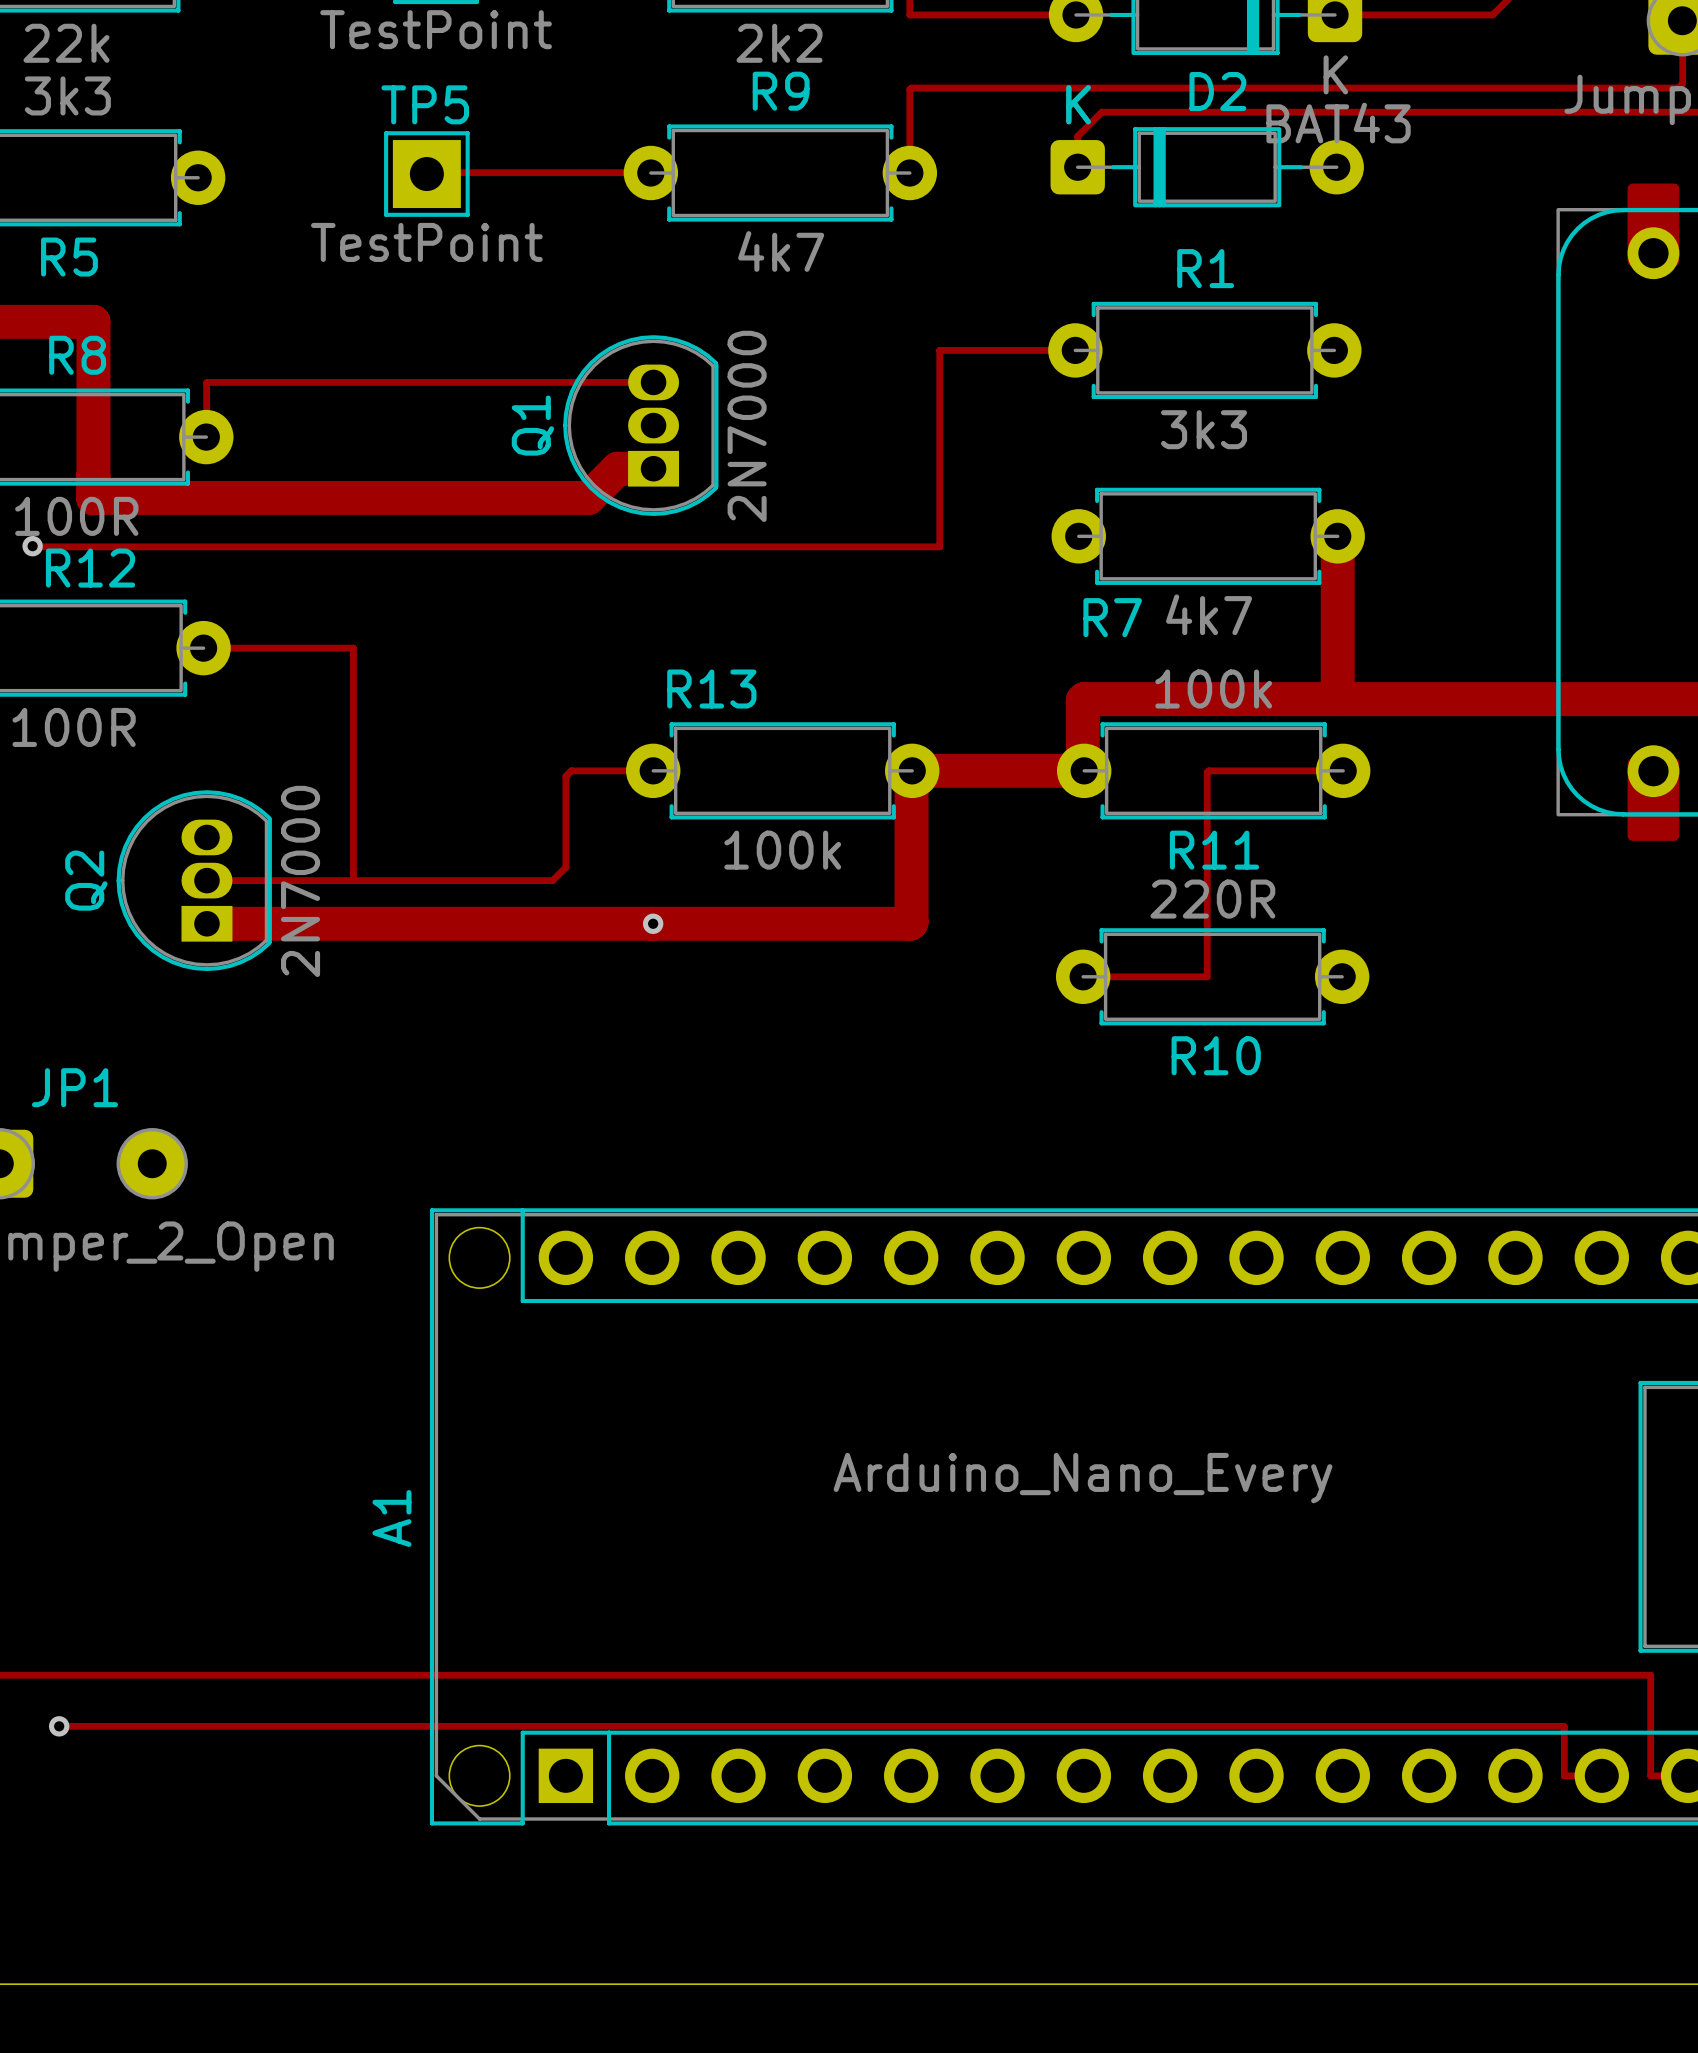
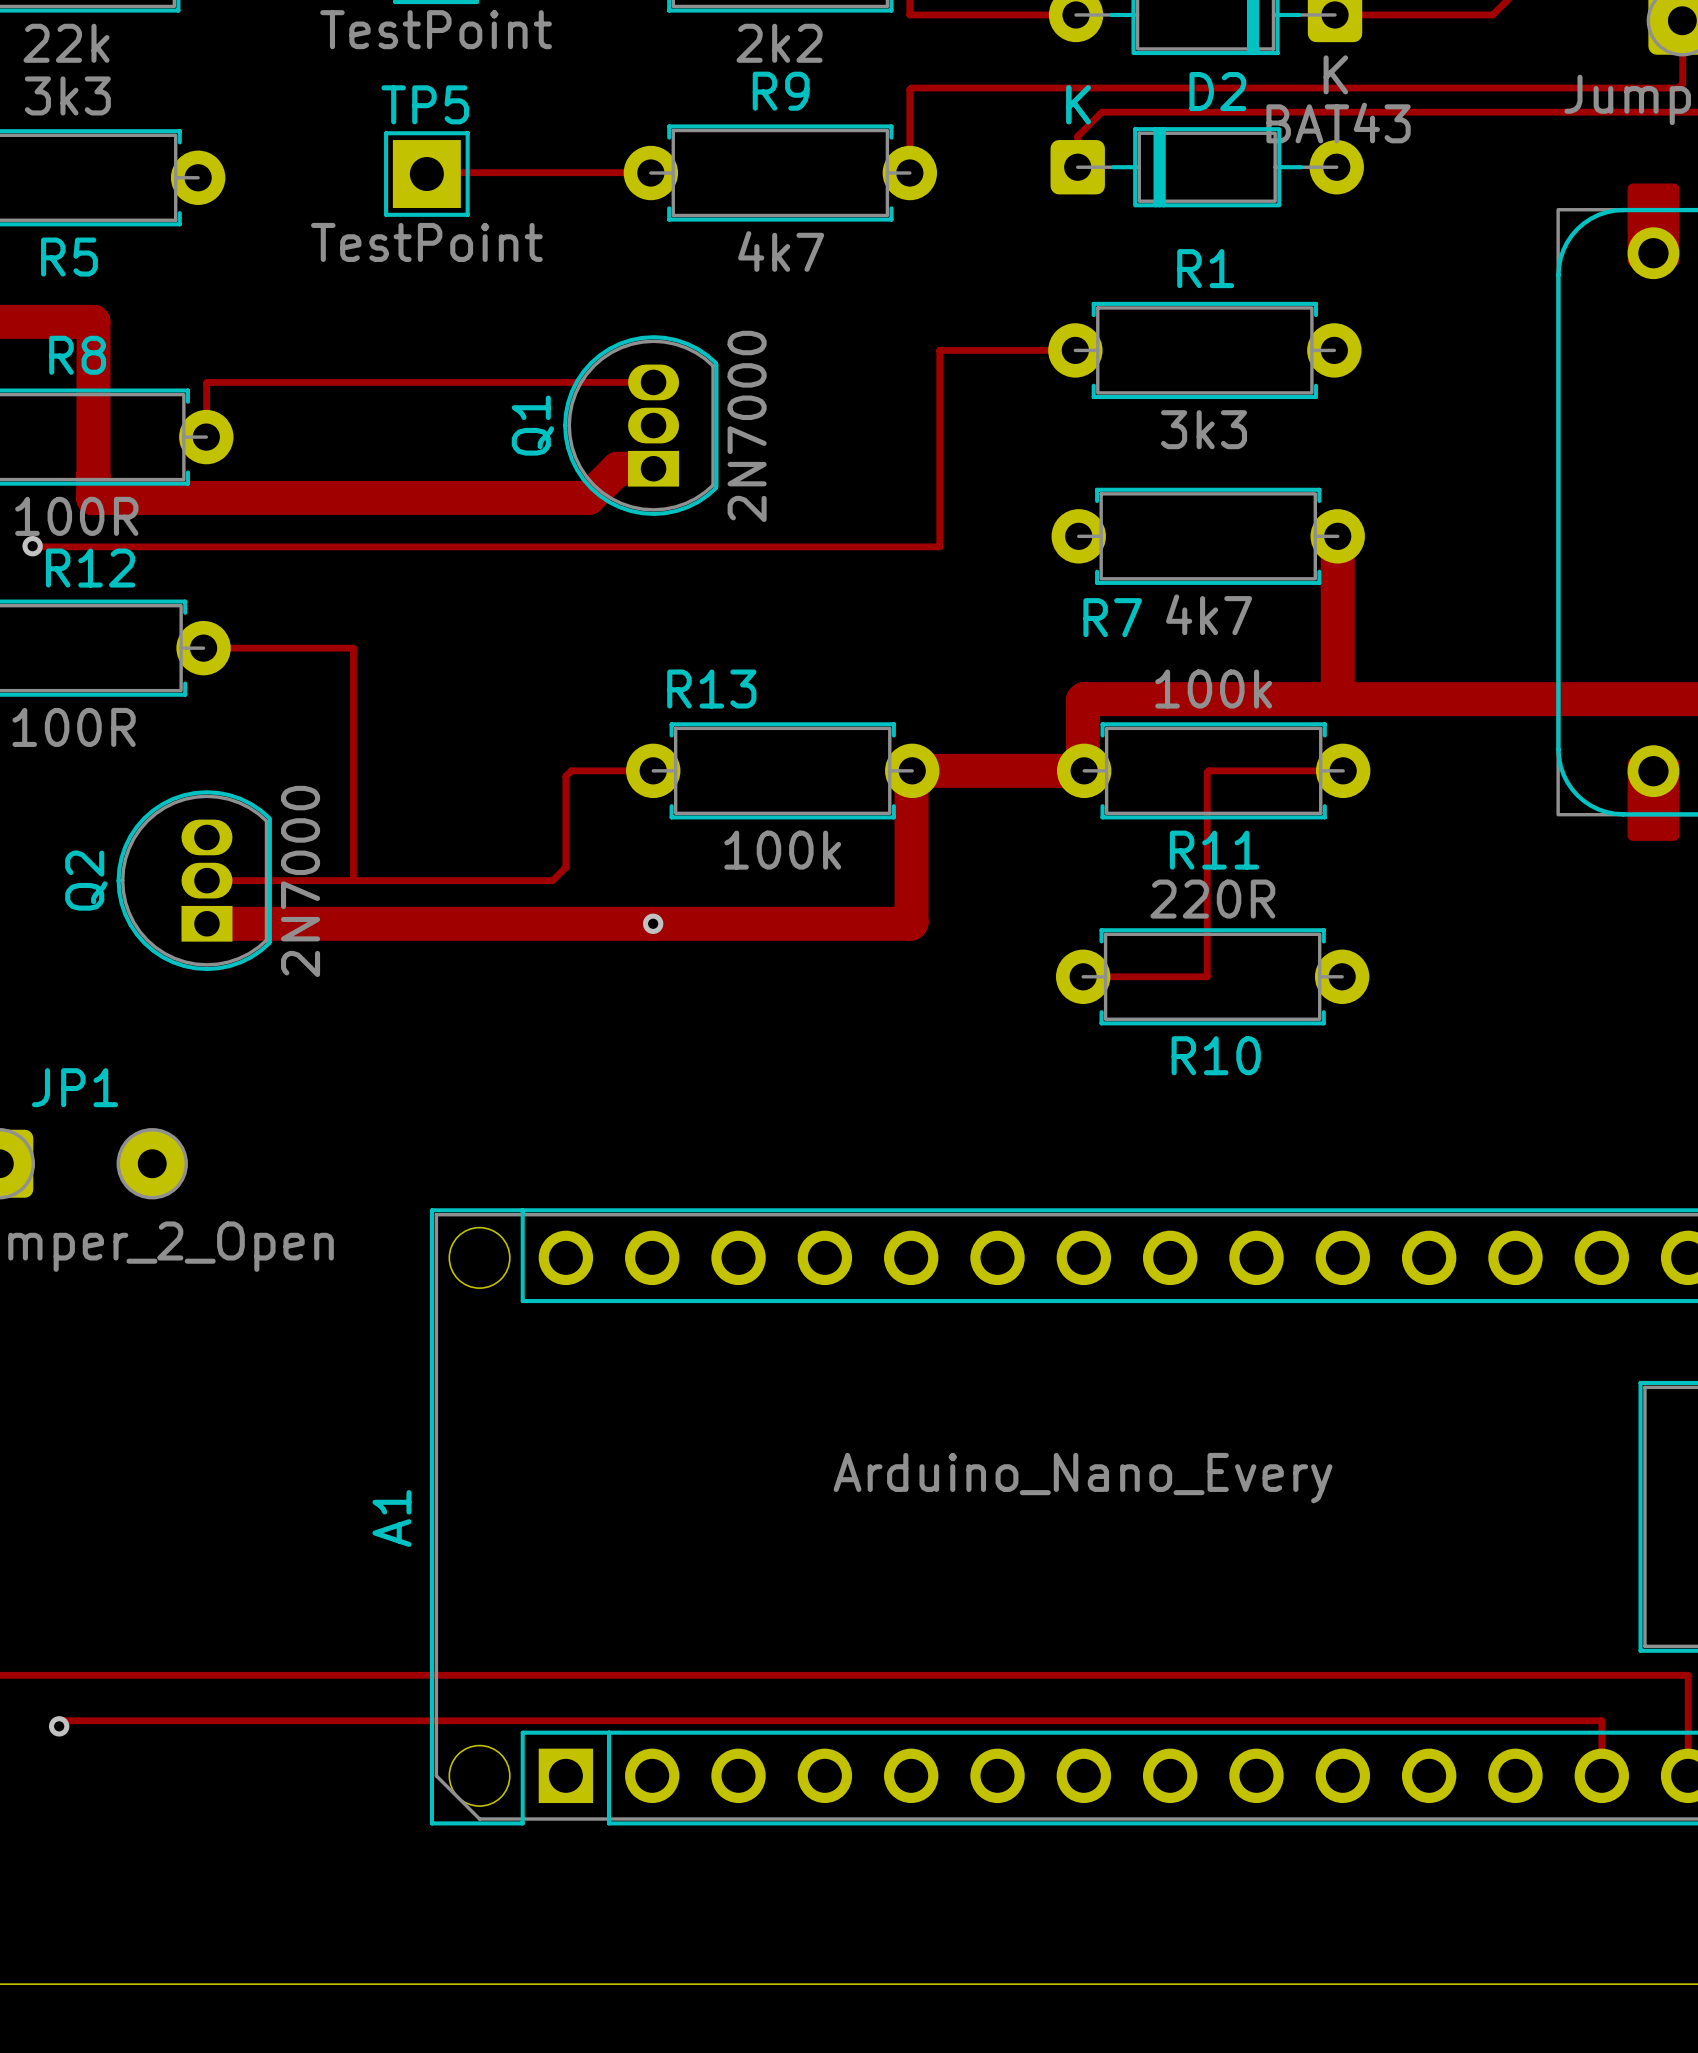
track: (1650, 1675) (1650, 1775) (1688, 1775) -> (1650, 1675) (1688, 1675) (1688, 1775)
track: (59, 1726) (1563, 1726) (1564, 1775) (1601, 1775) -> (59, 1726) (64, 1720) (1601, 1720) (1601, 1775)

